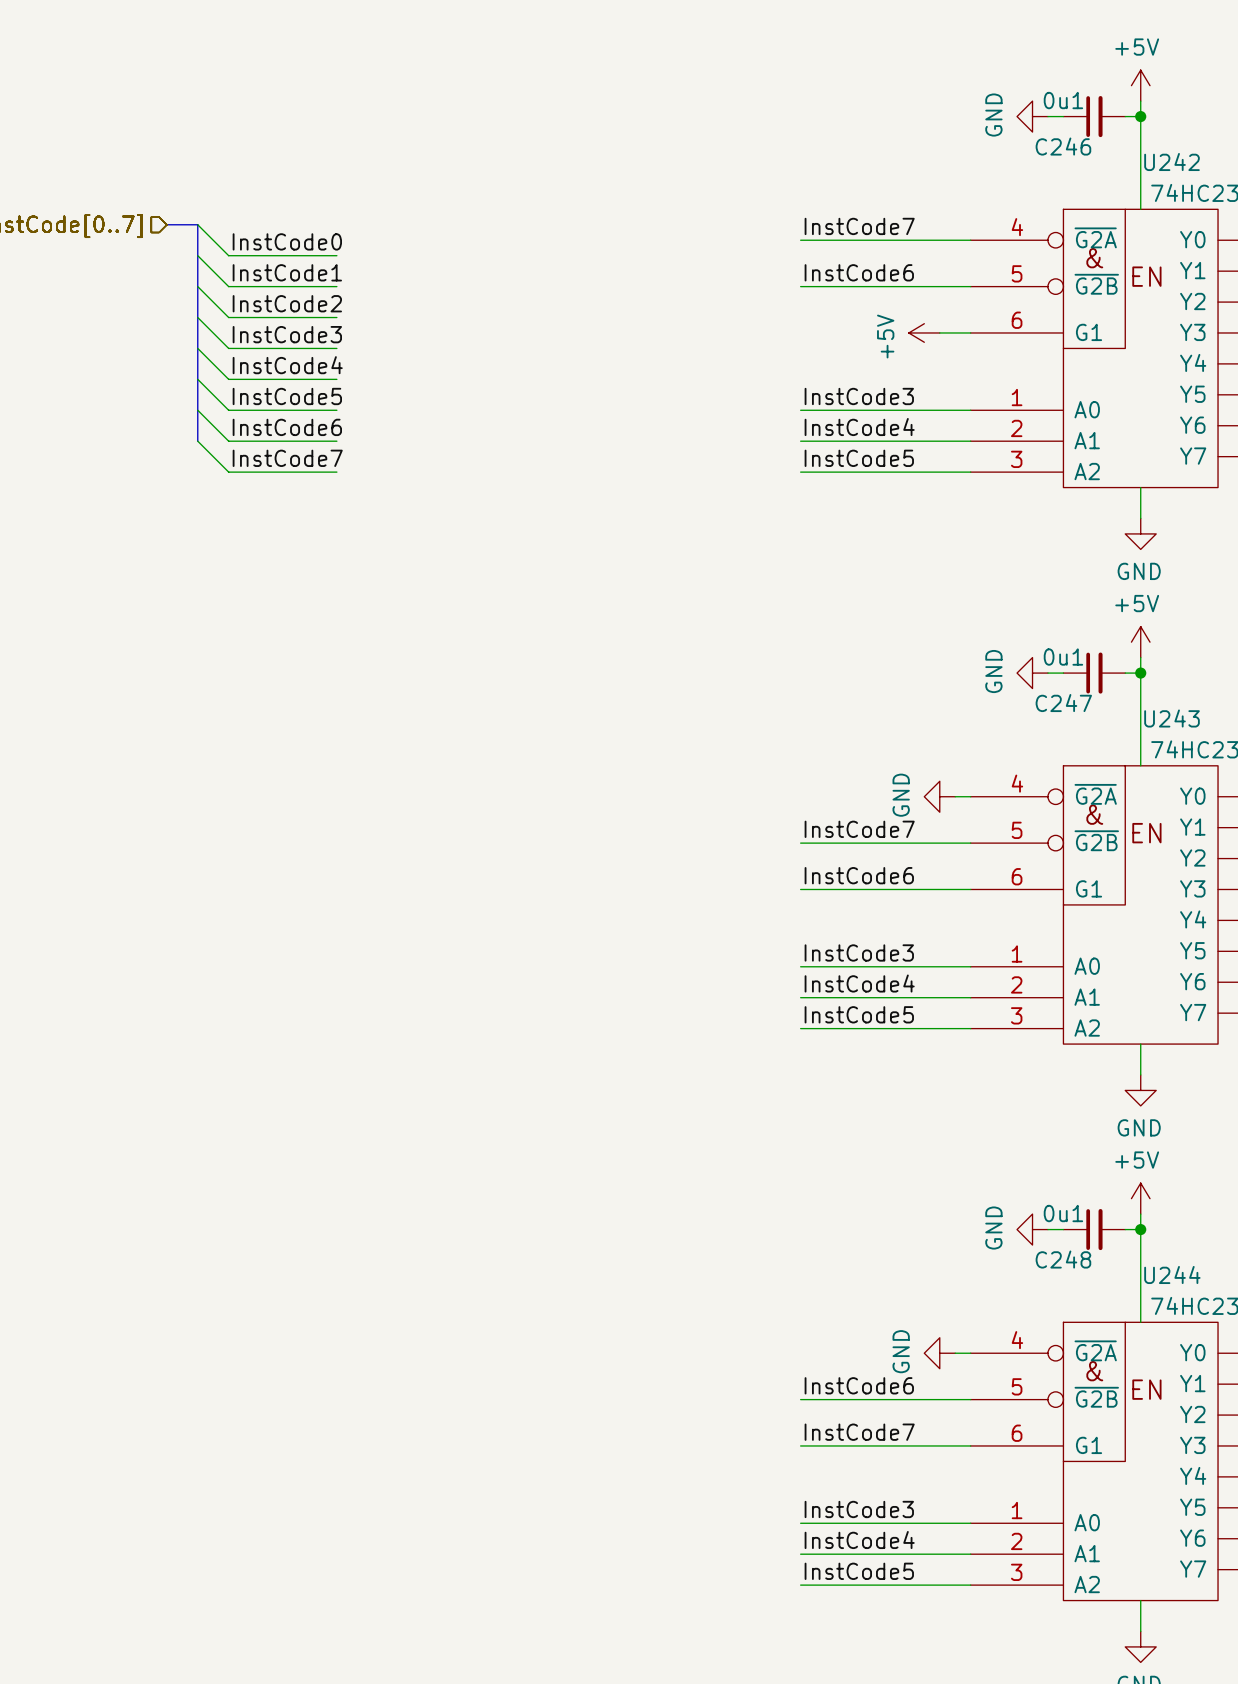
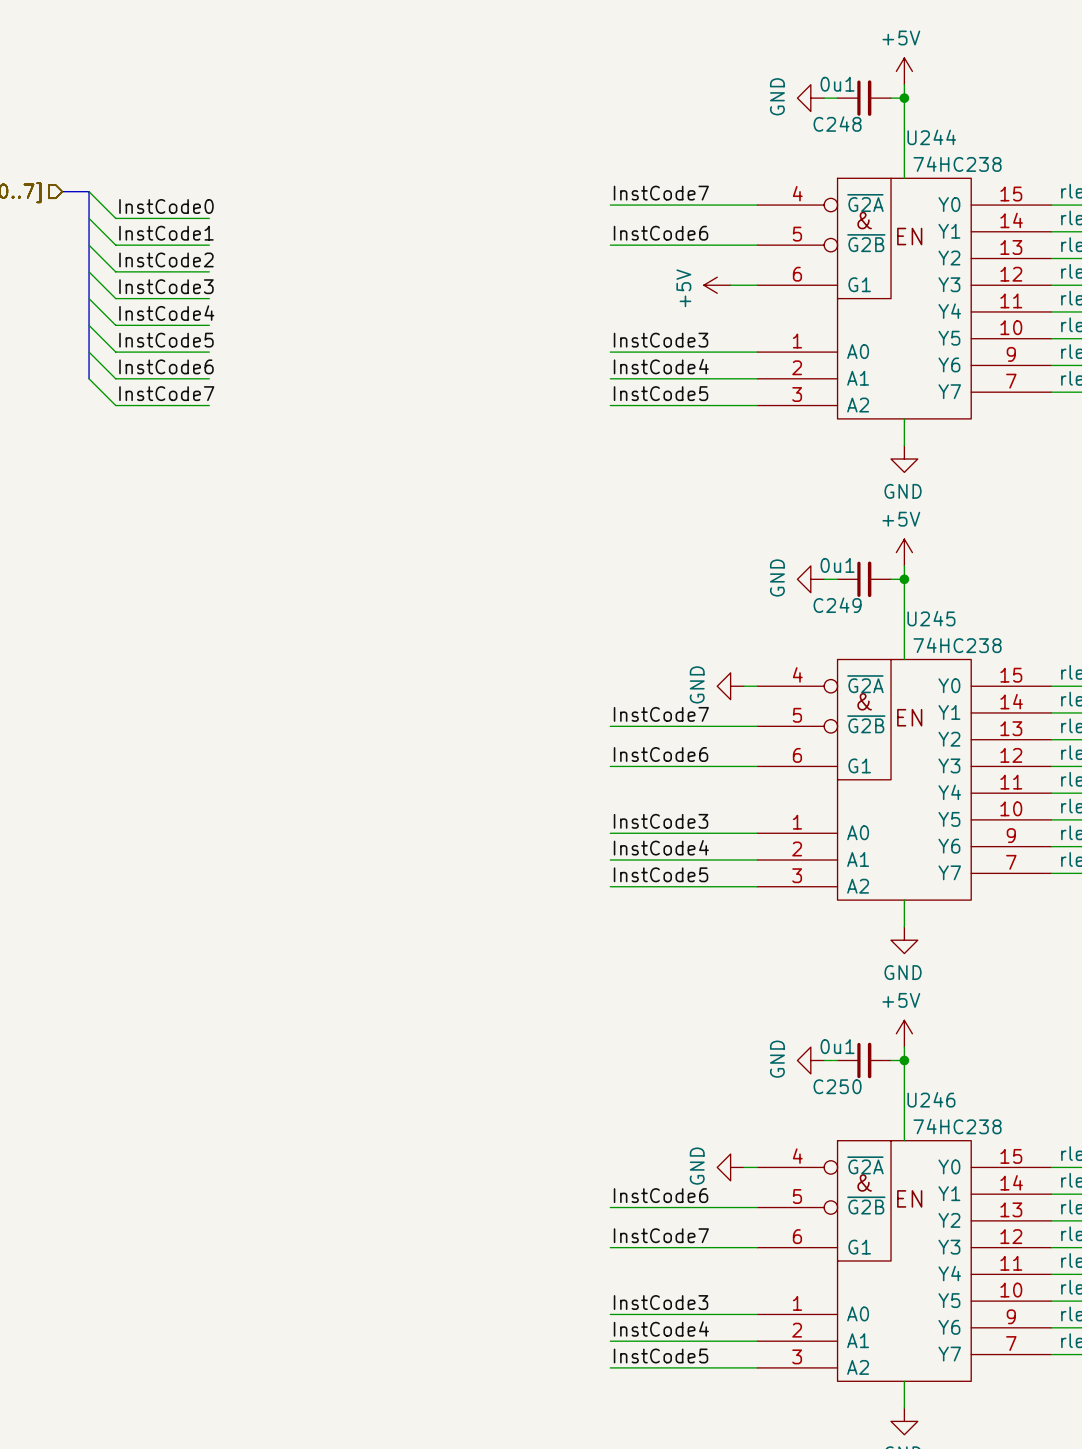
C246 name: C246 (1063, 146) -> C248 (837, 124)
U242 name: U242 (1172, 162) -> U244 (931, 137)
C247 name: C247 (1063, 703) -> C249 (837, 605)
U243 name: U243 (1172, 718) -> U245 (931, 618)
C248 name: C248 (1063, 1259) -> C250 (837, 1086)
U244 name: U244 (1172, 1274) -> U246 (931, 1099)

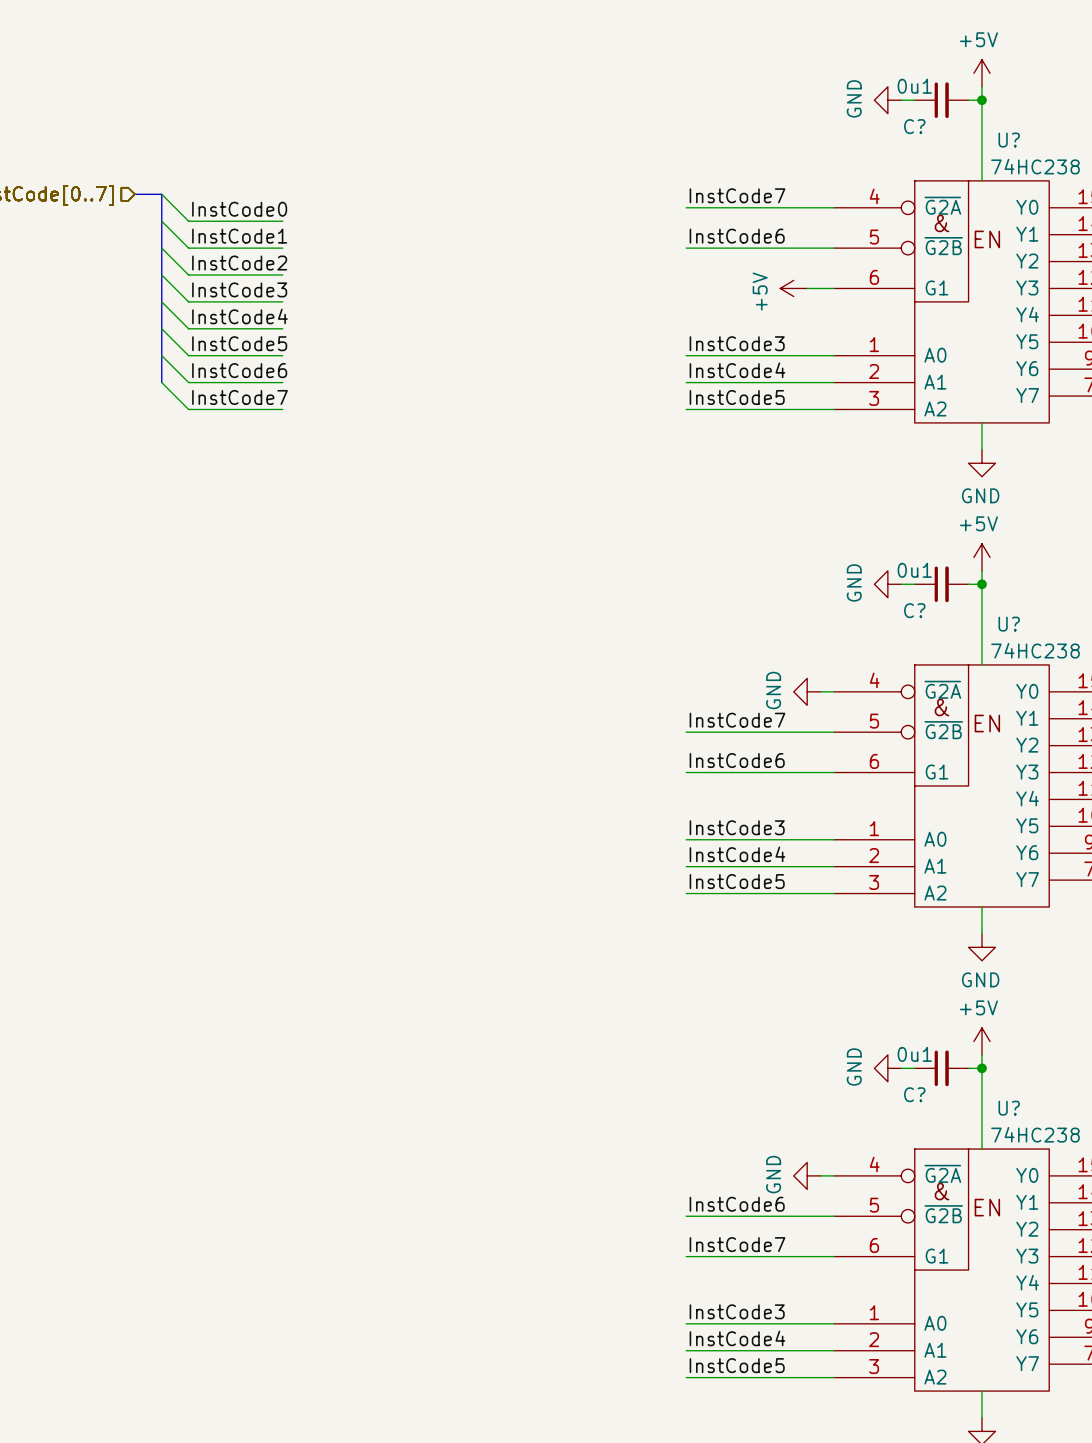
C248 name: C248 (837, 124) -> C? (914, 126)
U244 name: U244 (931, 137) -> U? (1009, 140)
C249 name: C249 (837, 605) -> C? (914, 610)
U245 name: U245 (931, 618) -> U? (1009, 624)
C250 name: C250 (837, 1086) -> C? (914, 1094)
U246 name: U246 (931, 1099) -> U? (1009, 1108)

